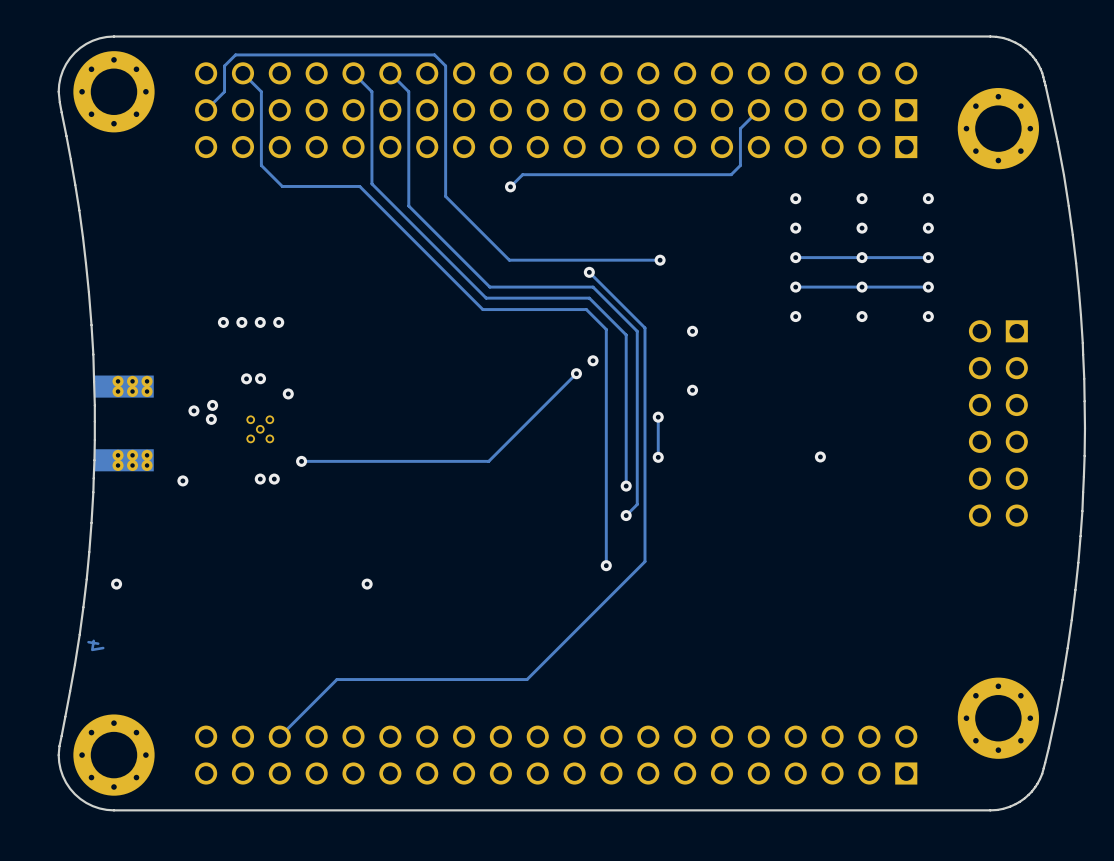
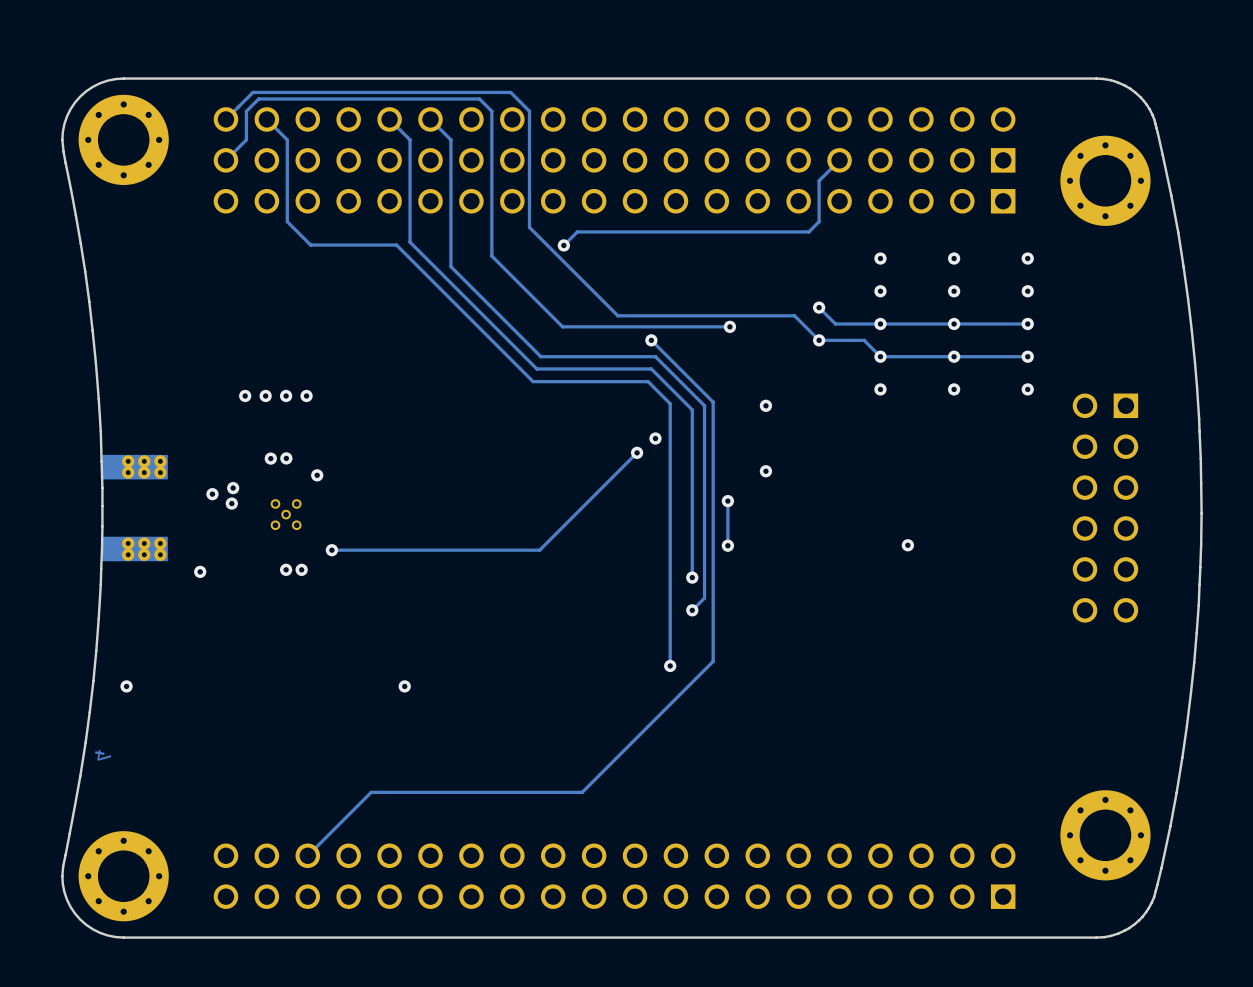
track: none -> (225, 119) (252, 92) (510, 92) (529, 111) (529, 227) (617, 315) (794, 315) (819, 340) (864, 340) (880, 356)
track: none -> (819, 307) (835, 323) (880, 323)
via: none -> (819, 307)
via: none -> (819, 340)

